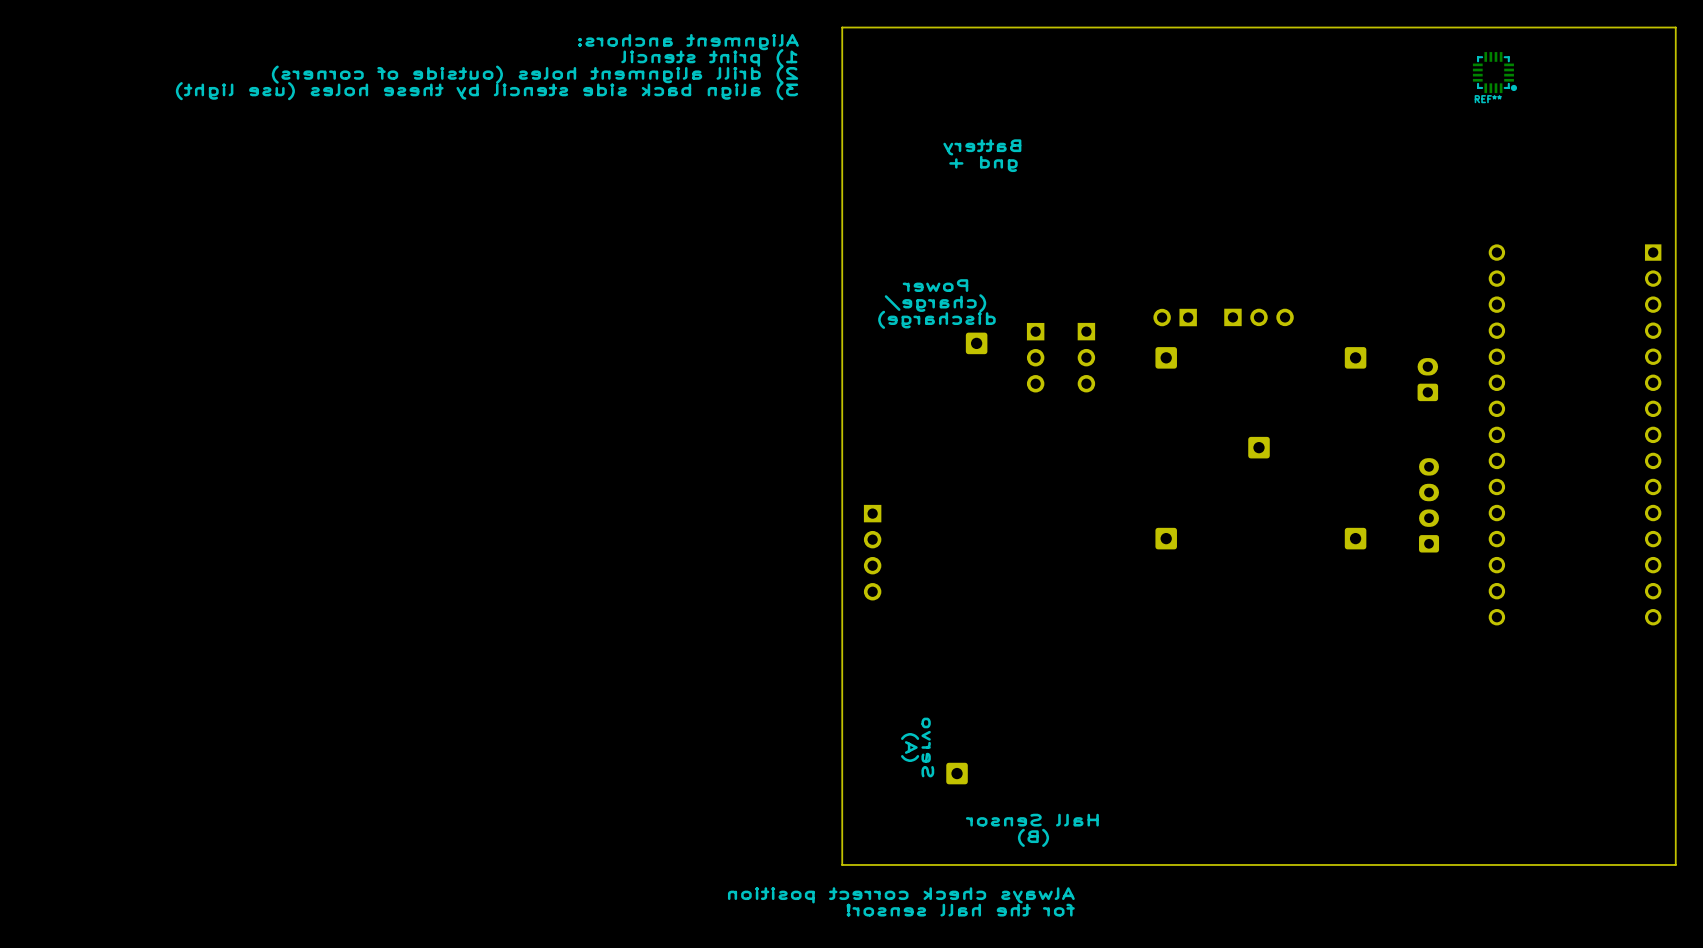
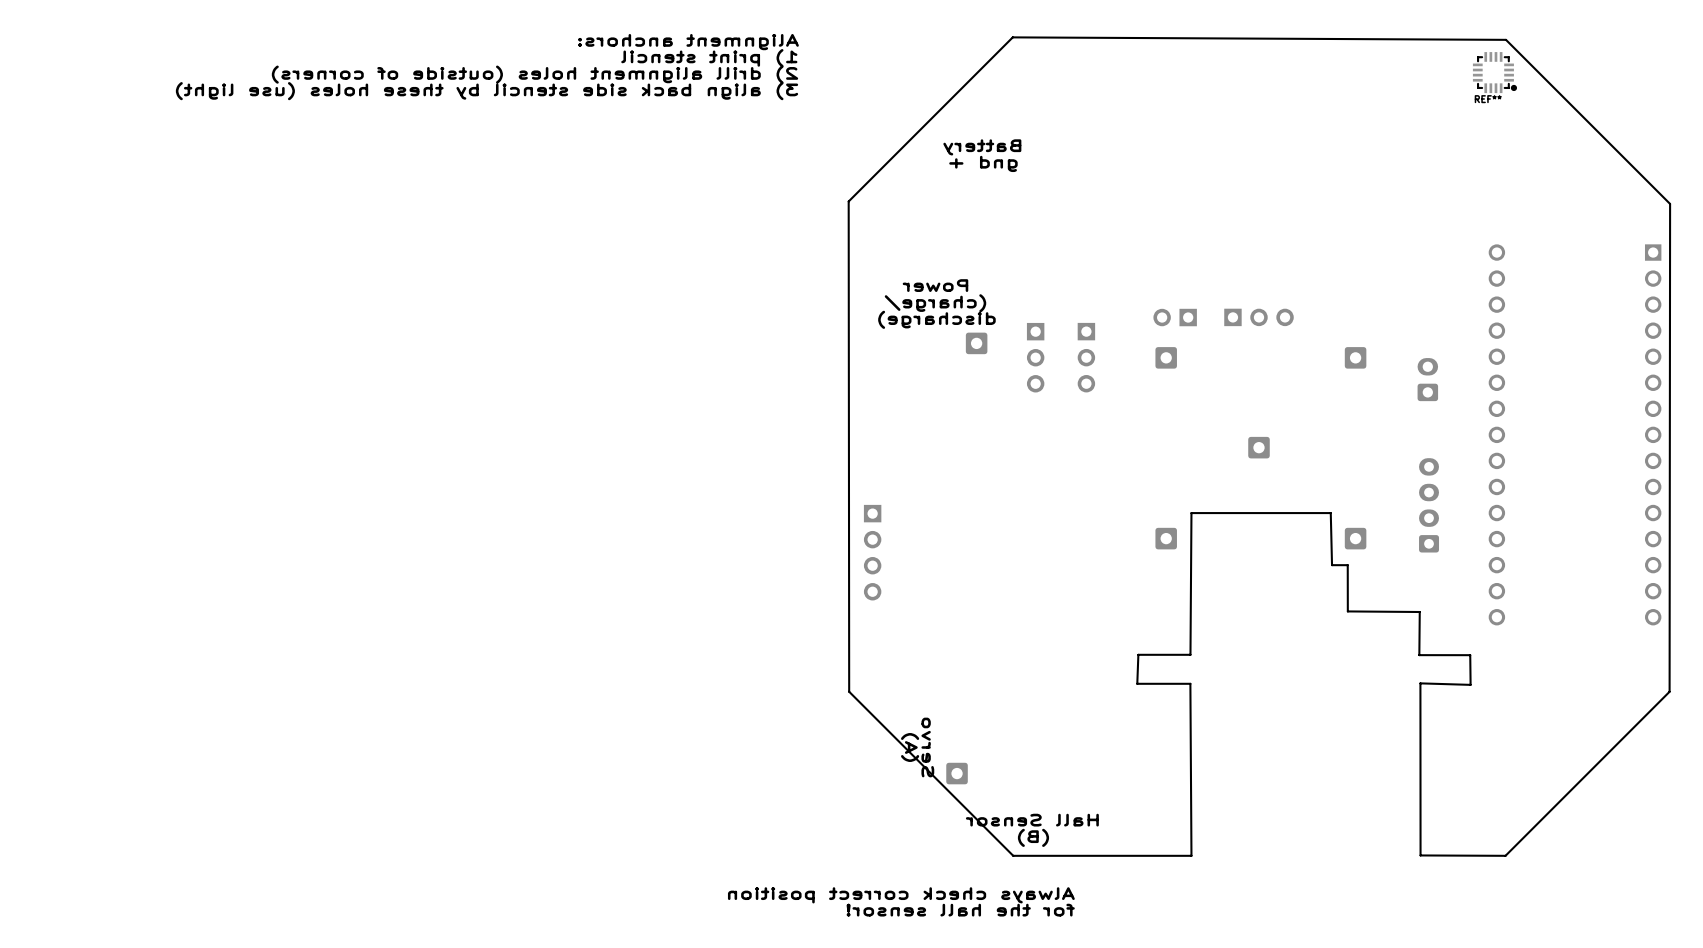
board edge: (1675, 27) (842, 27) (842, 864) (1675, 864) (1675, 27) -> (1012, 37) (1506, 39) (1670, 203) (1669, 691) (1505, 855) (1420, 855) (1420, 683) (1470, 684) (1470, 655) (1419, 655) (1419, 612) (1347, 611) (1347, 565) (1332, 565) (1330, 513) (1191, 513) (1190, 654) (1138, 654) (1137, 683) (1190, 683) (1191, 855) (1013, 855) (849, 691) (848, 201) (1012, 37)

